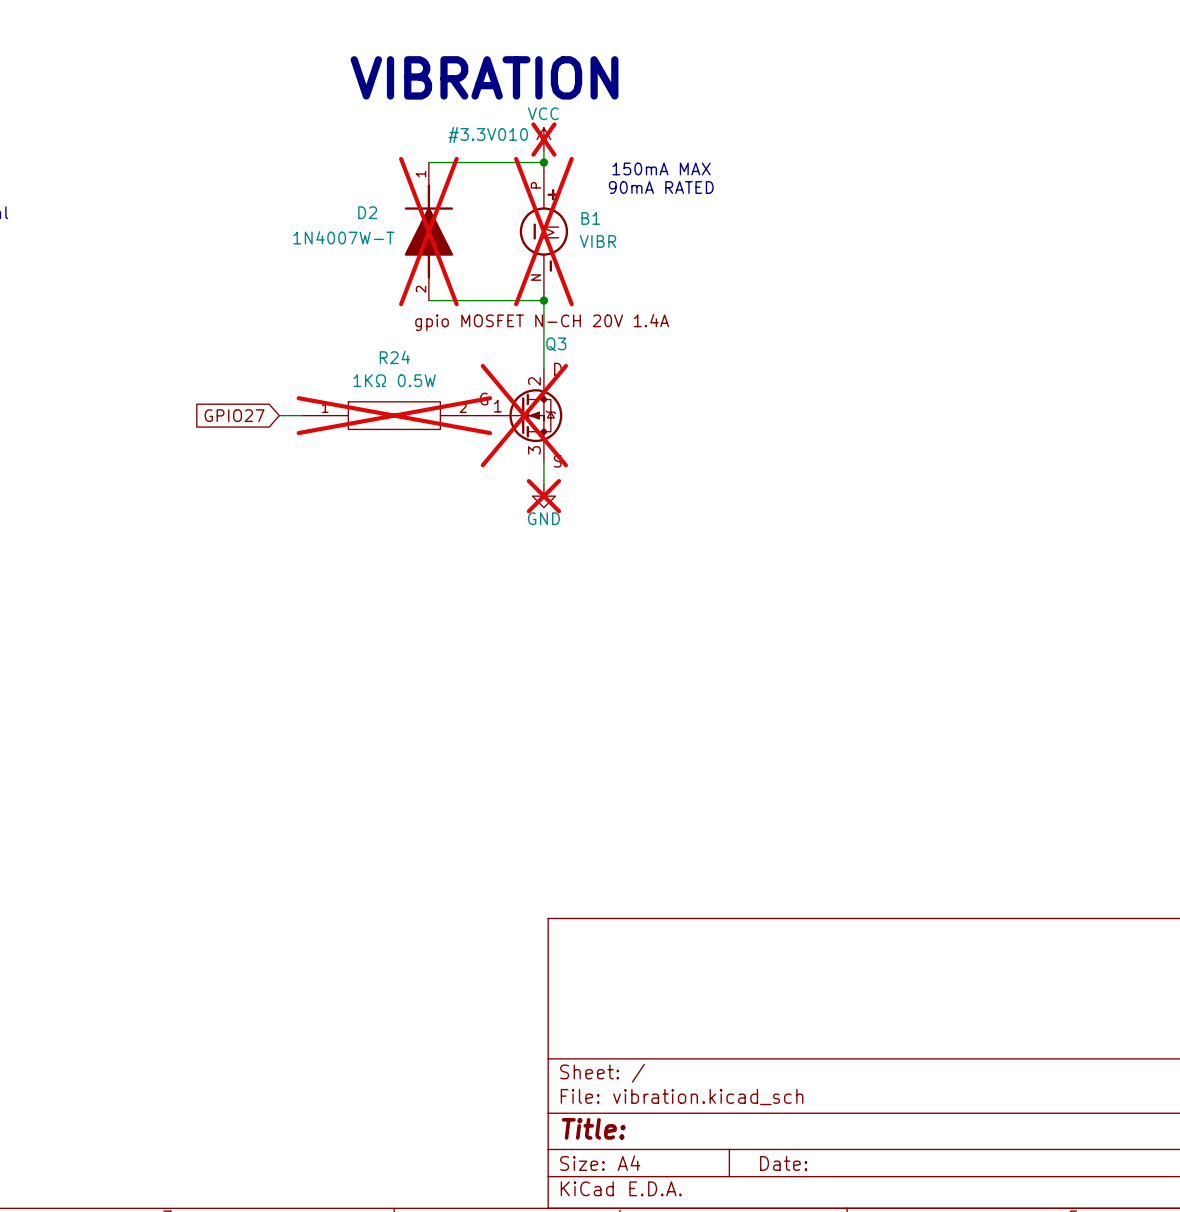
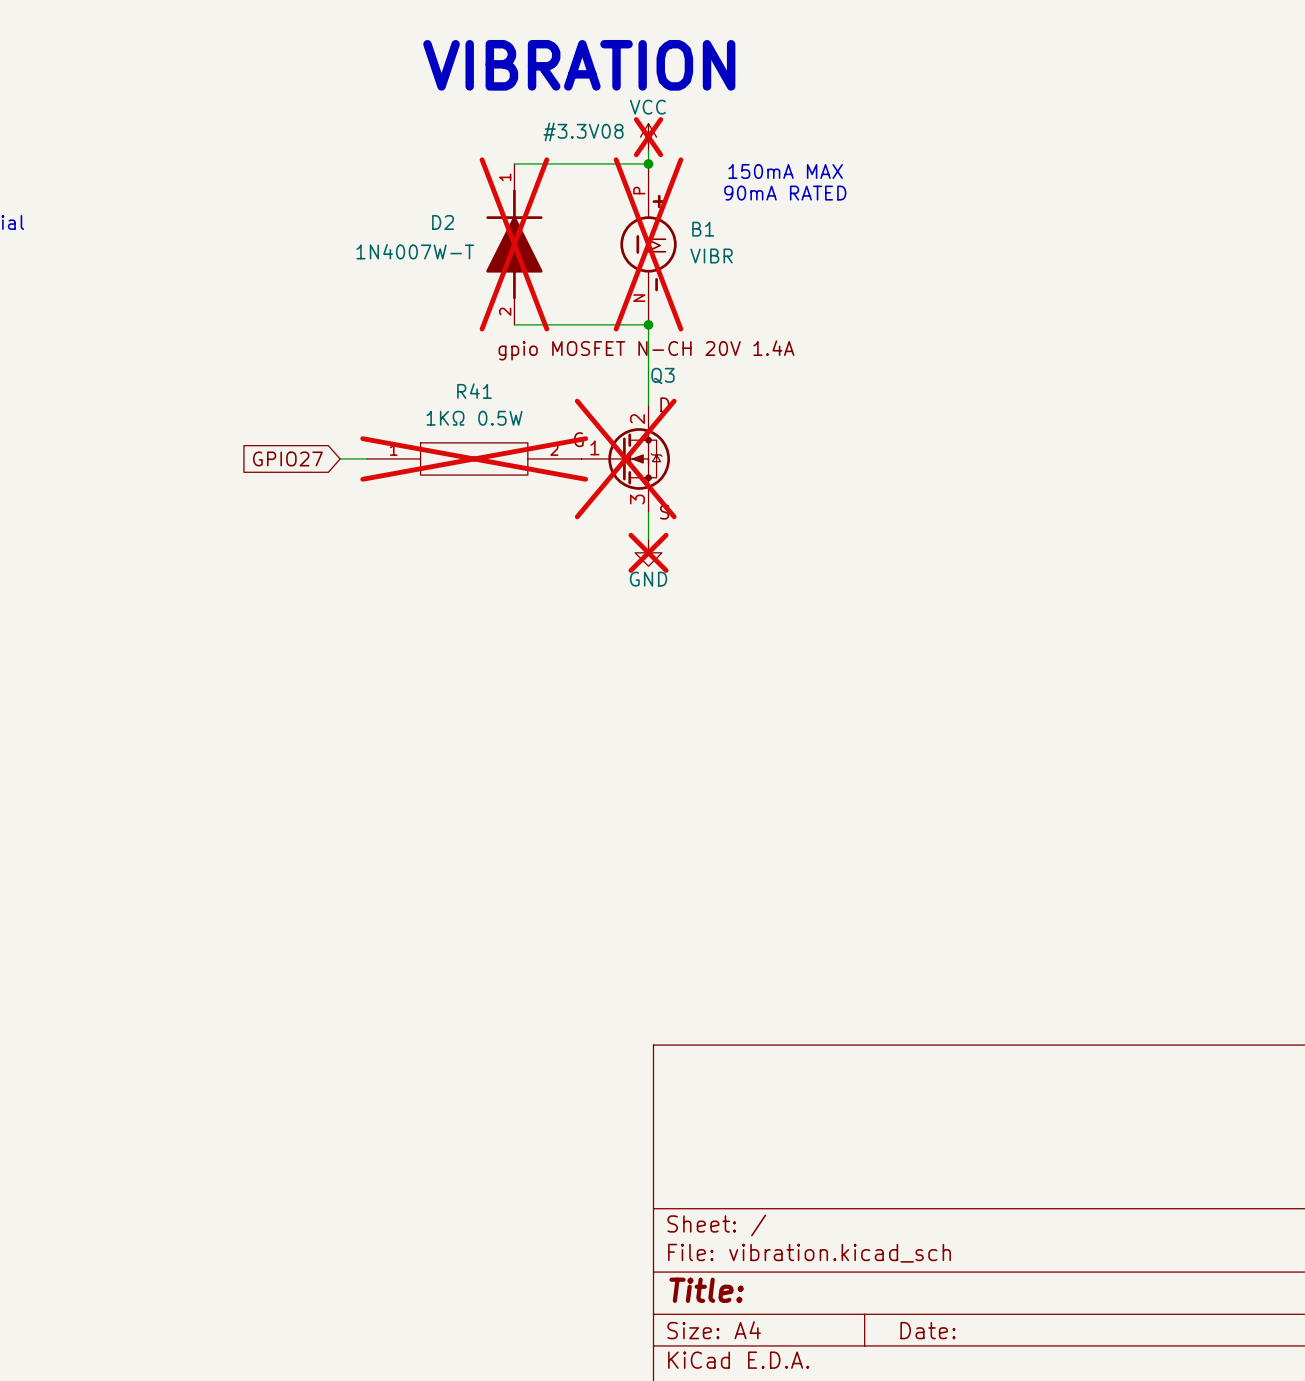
#3.3V010 name: #3.3V010 (488, 135) -> #3.3V08 (583, 131)
R24 name: R24 (394, 357) -> R41 (474, 391)

